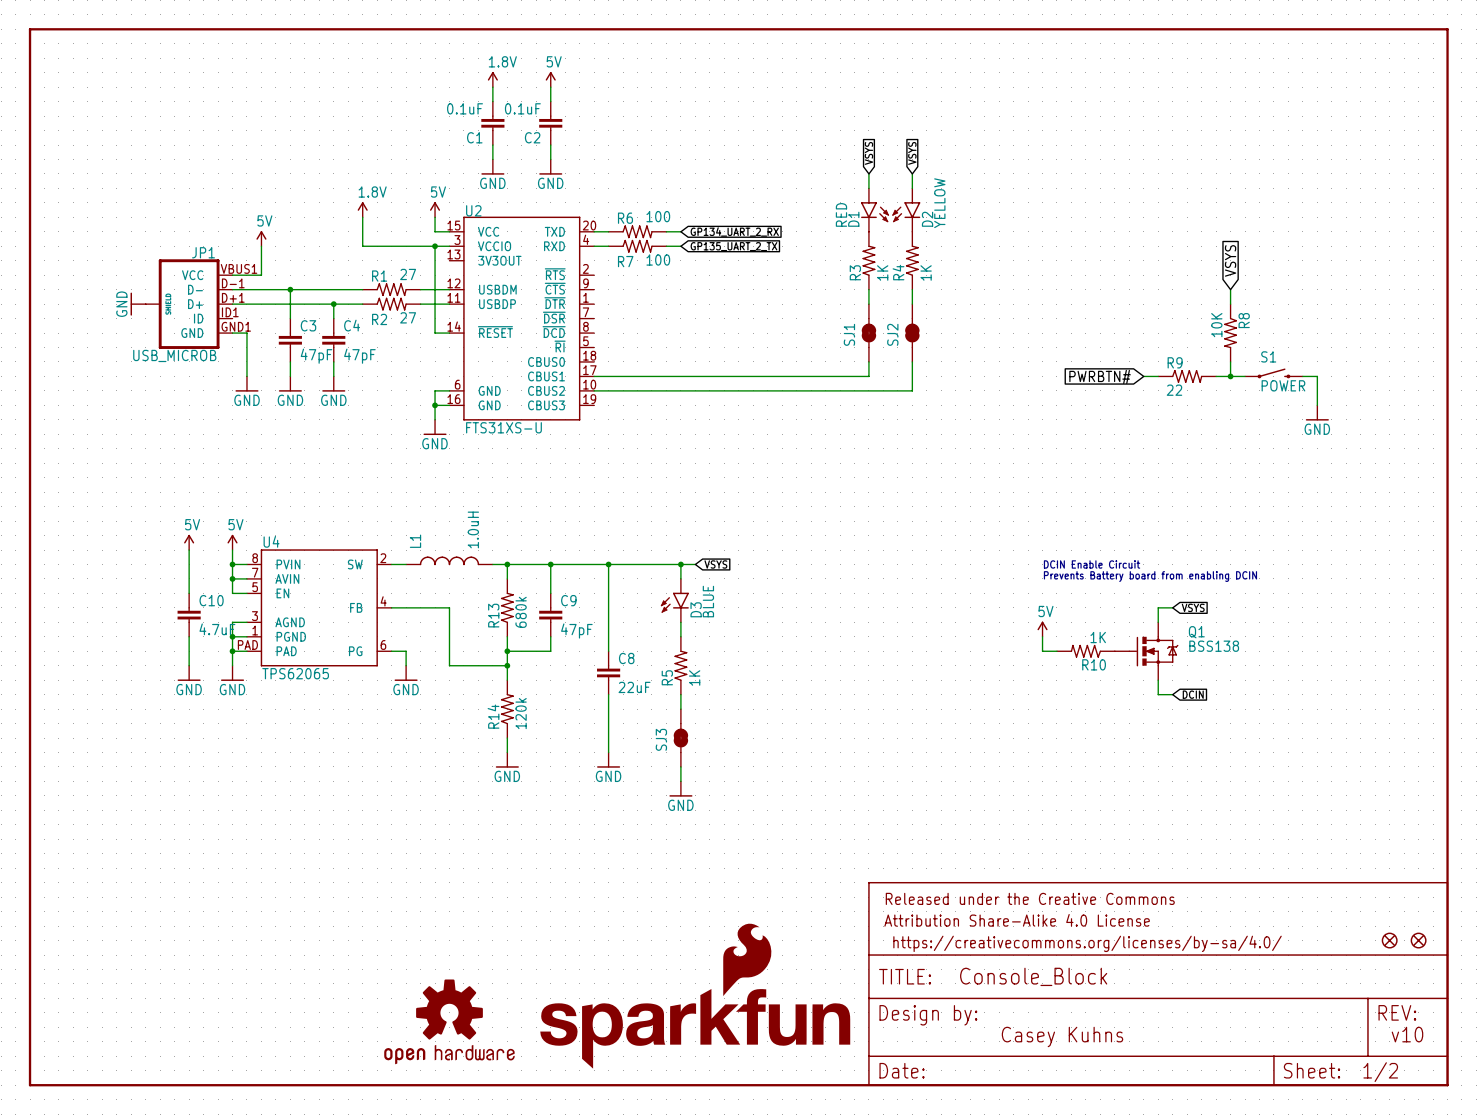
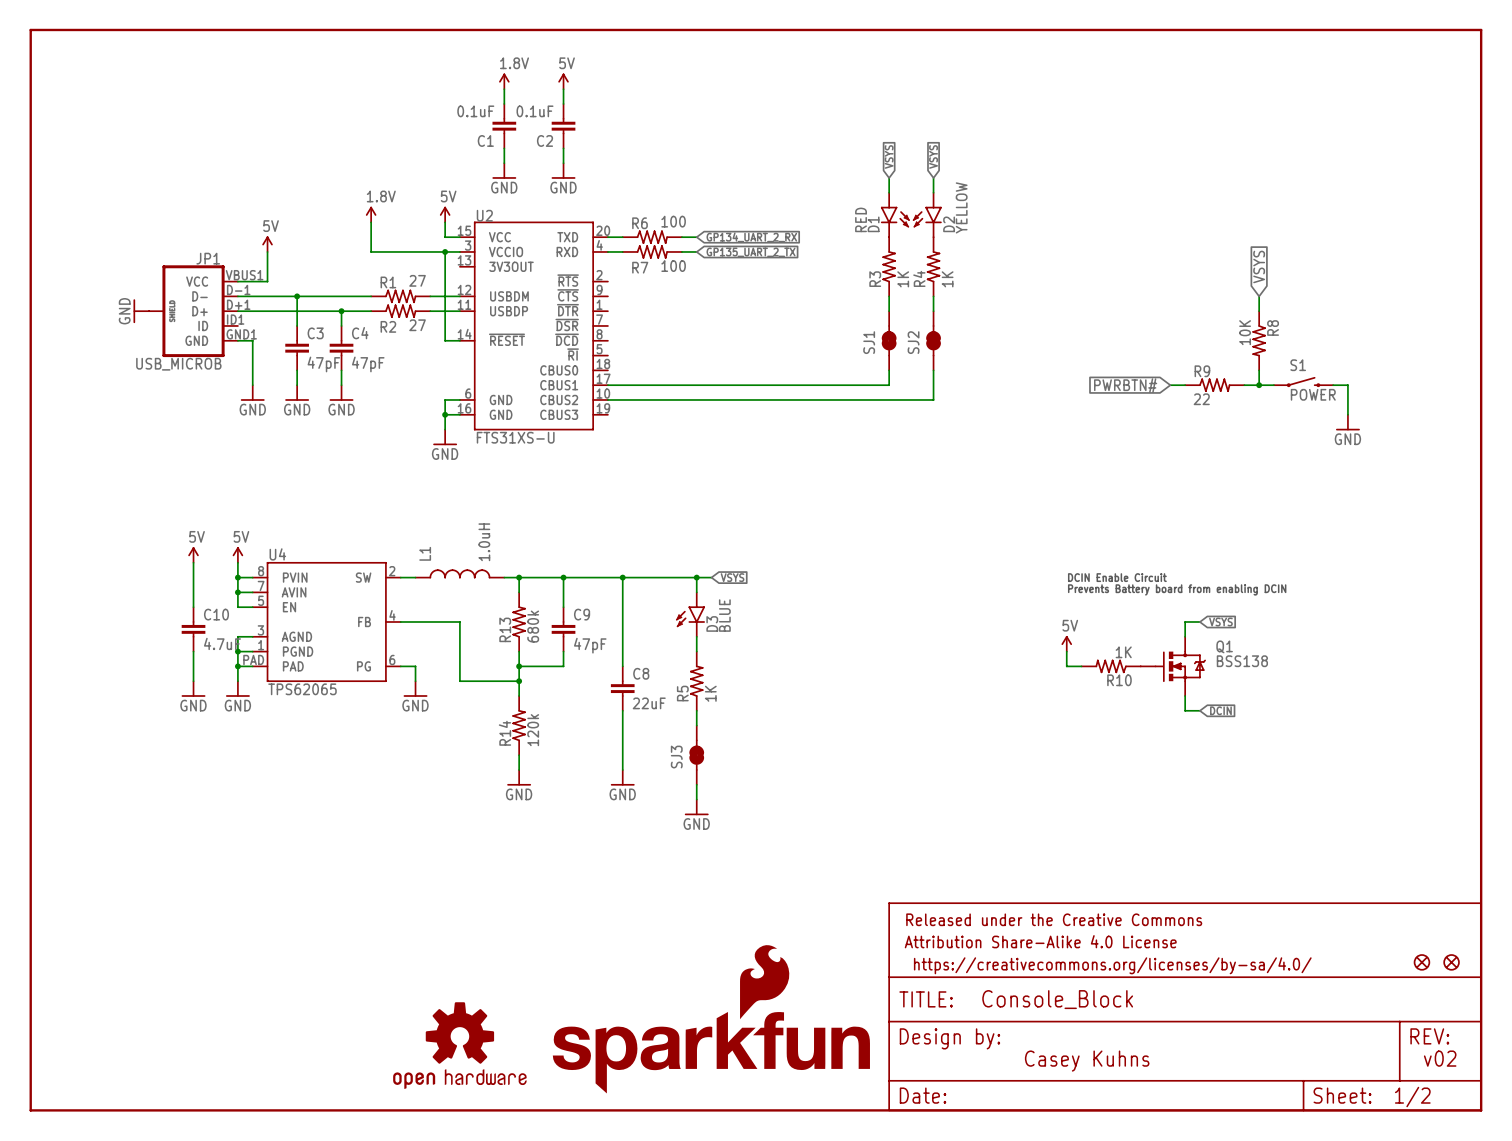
text: v10 (1407, 1034) -> v02 (1440, 1058)

